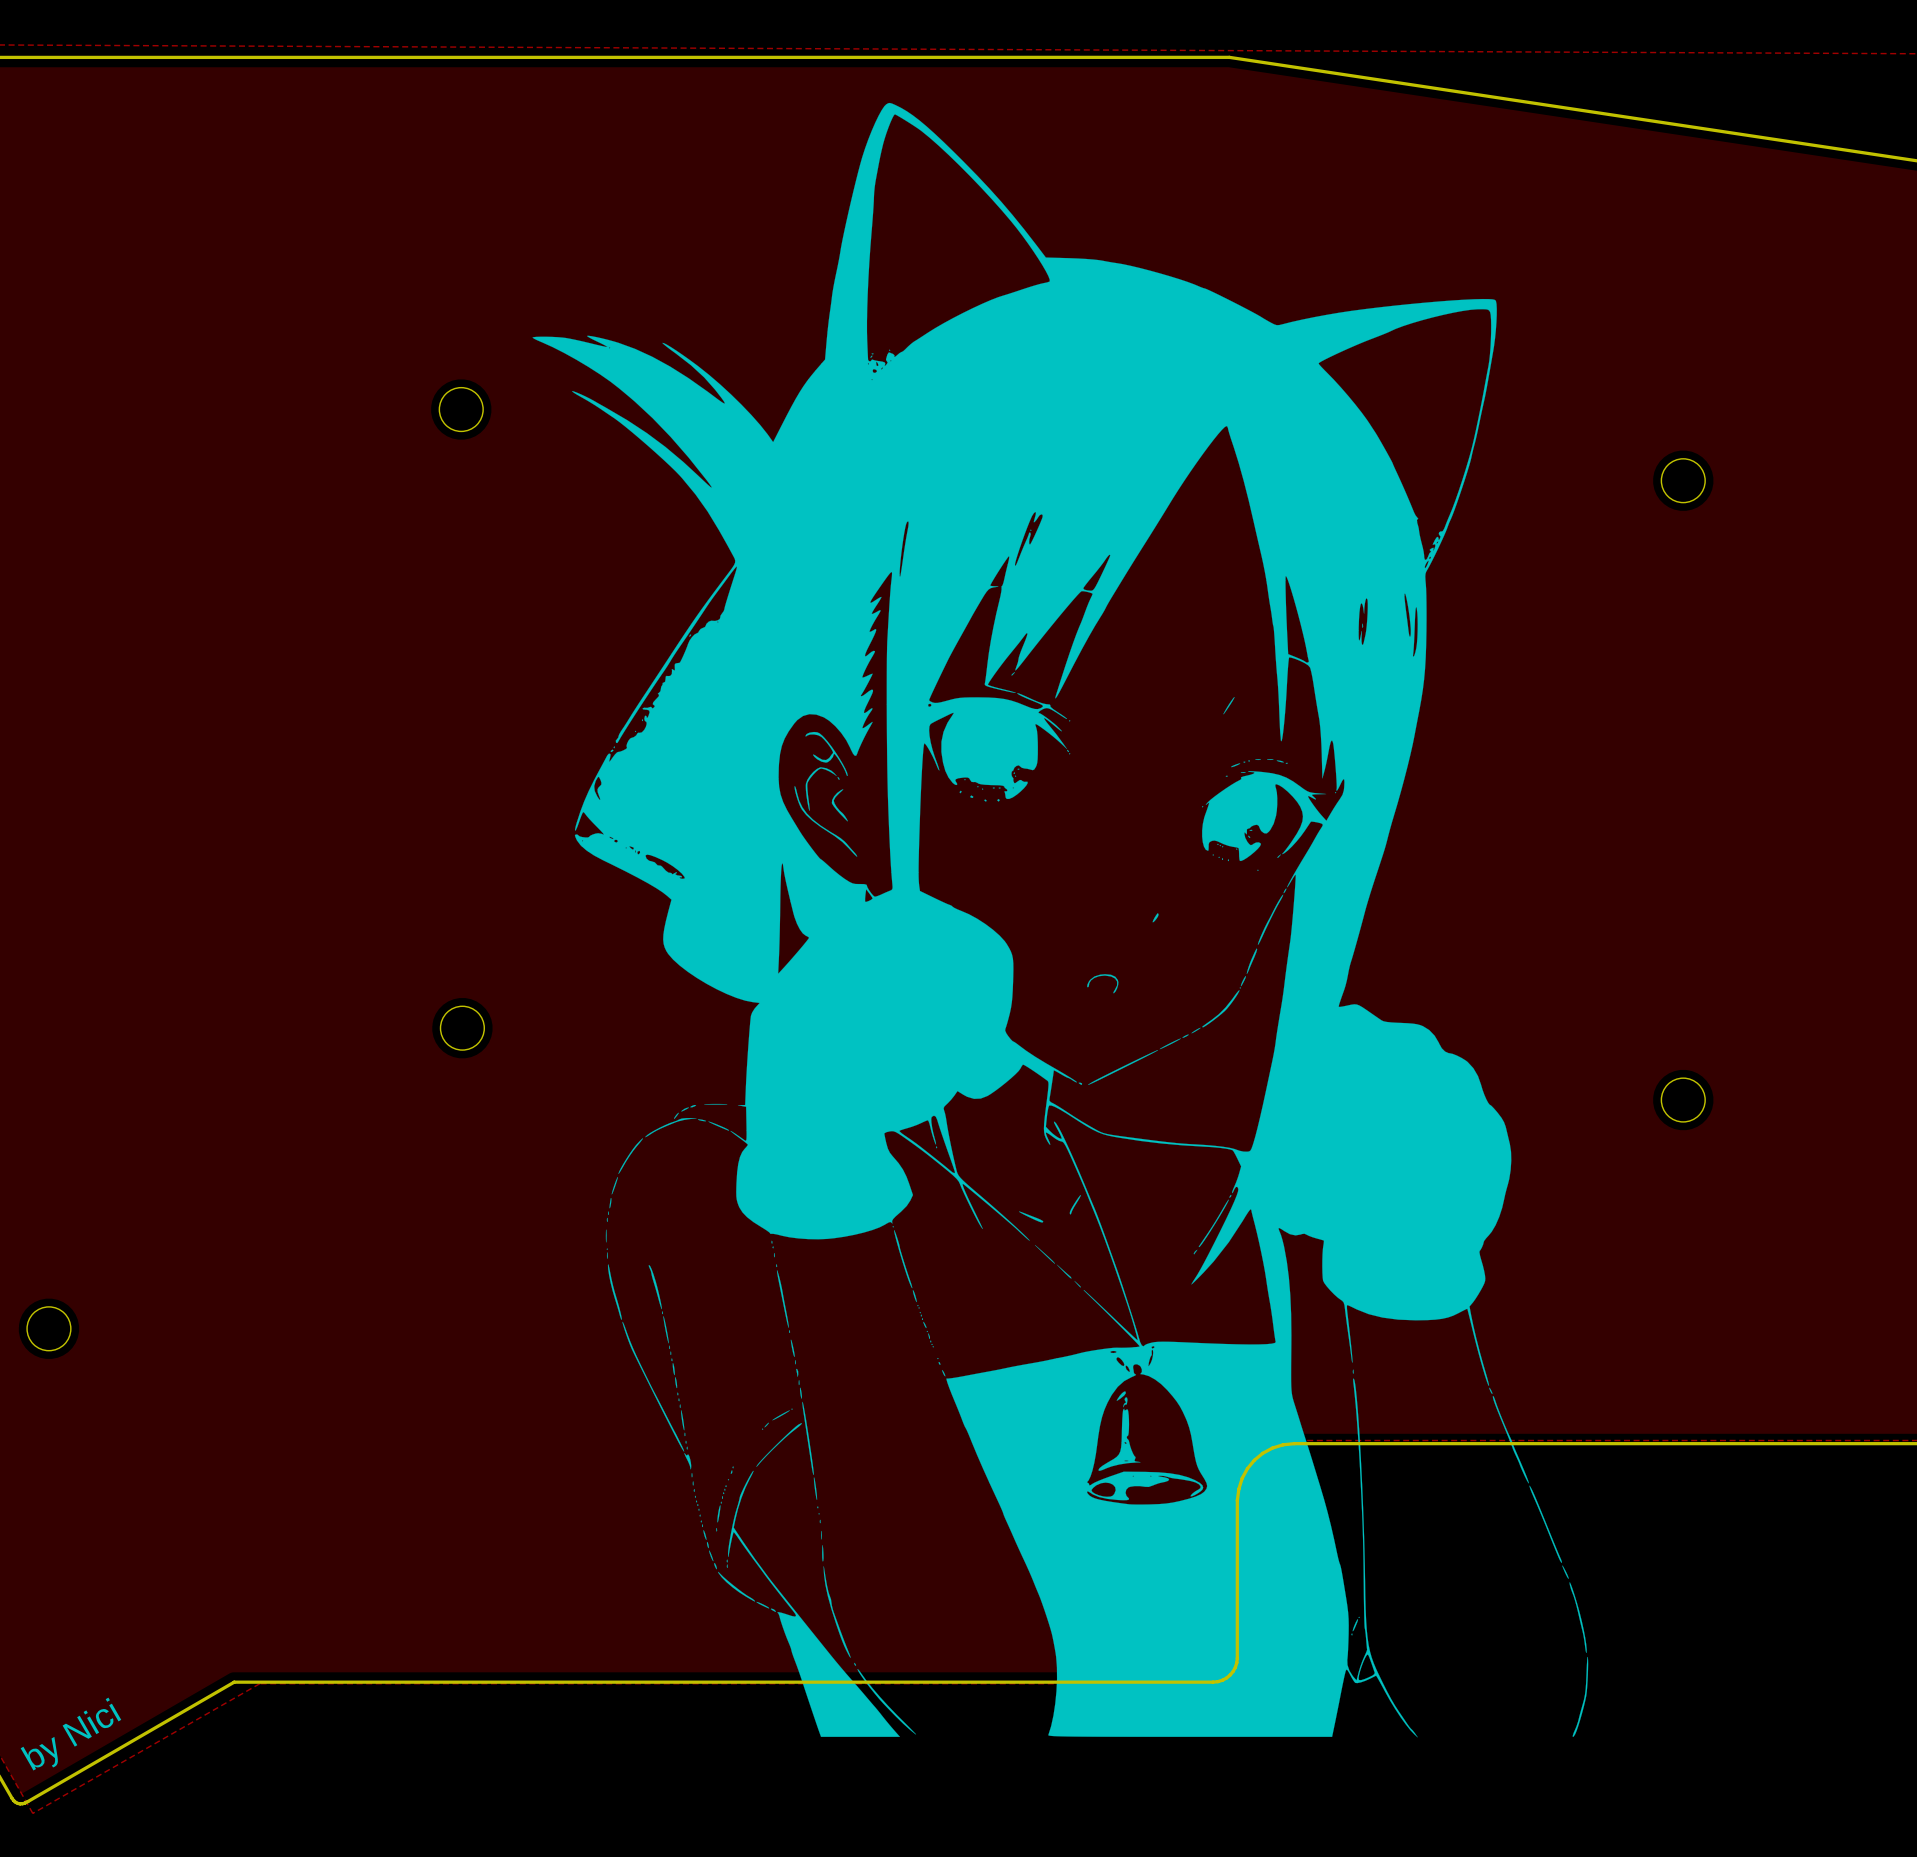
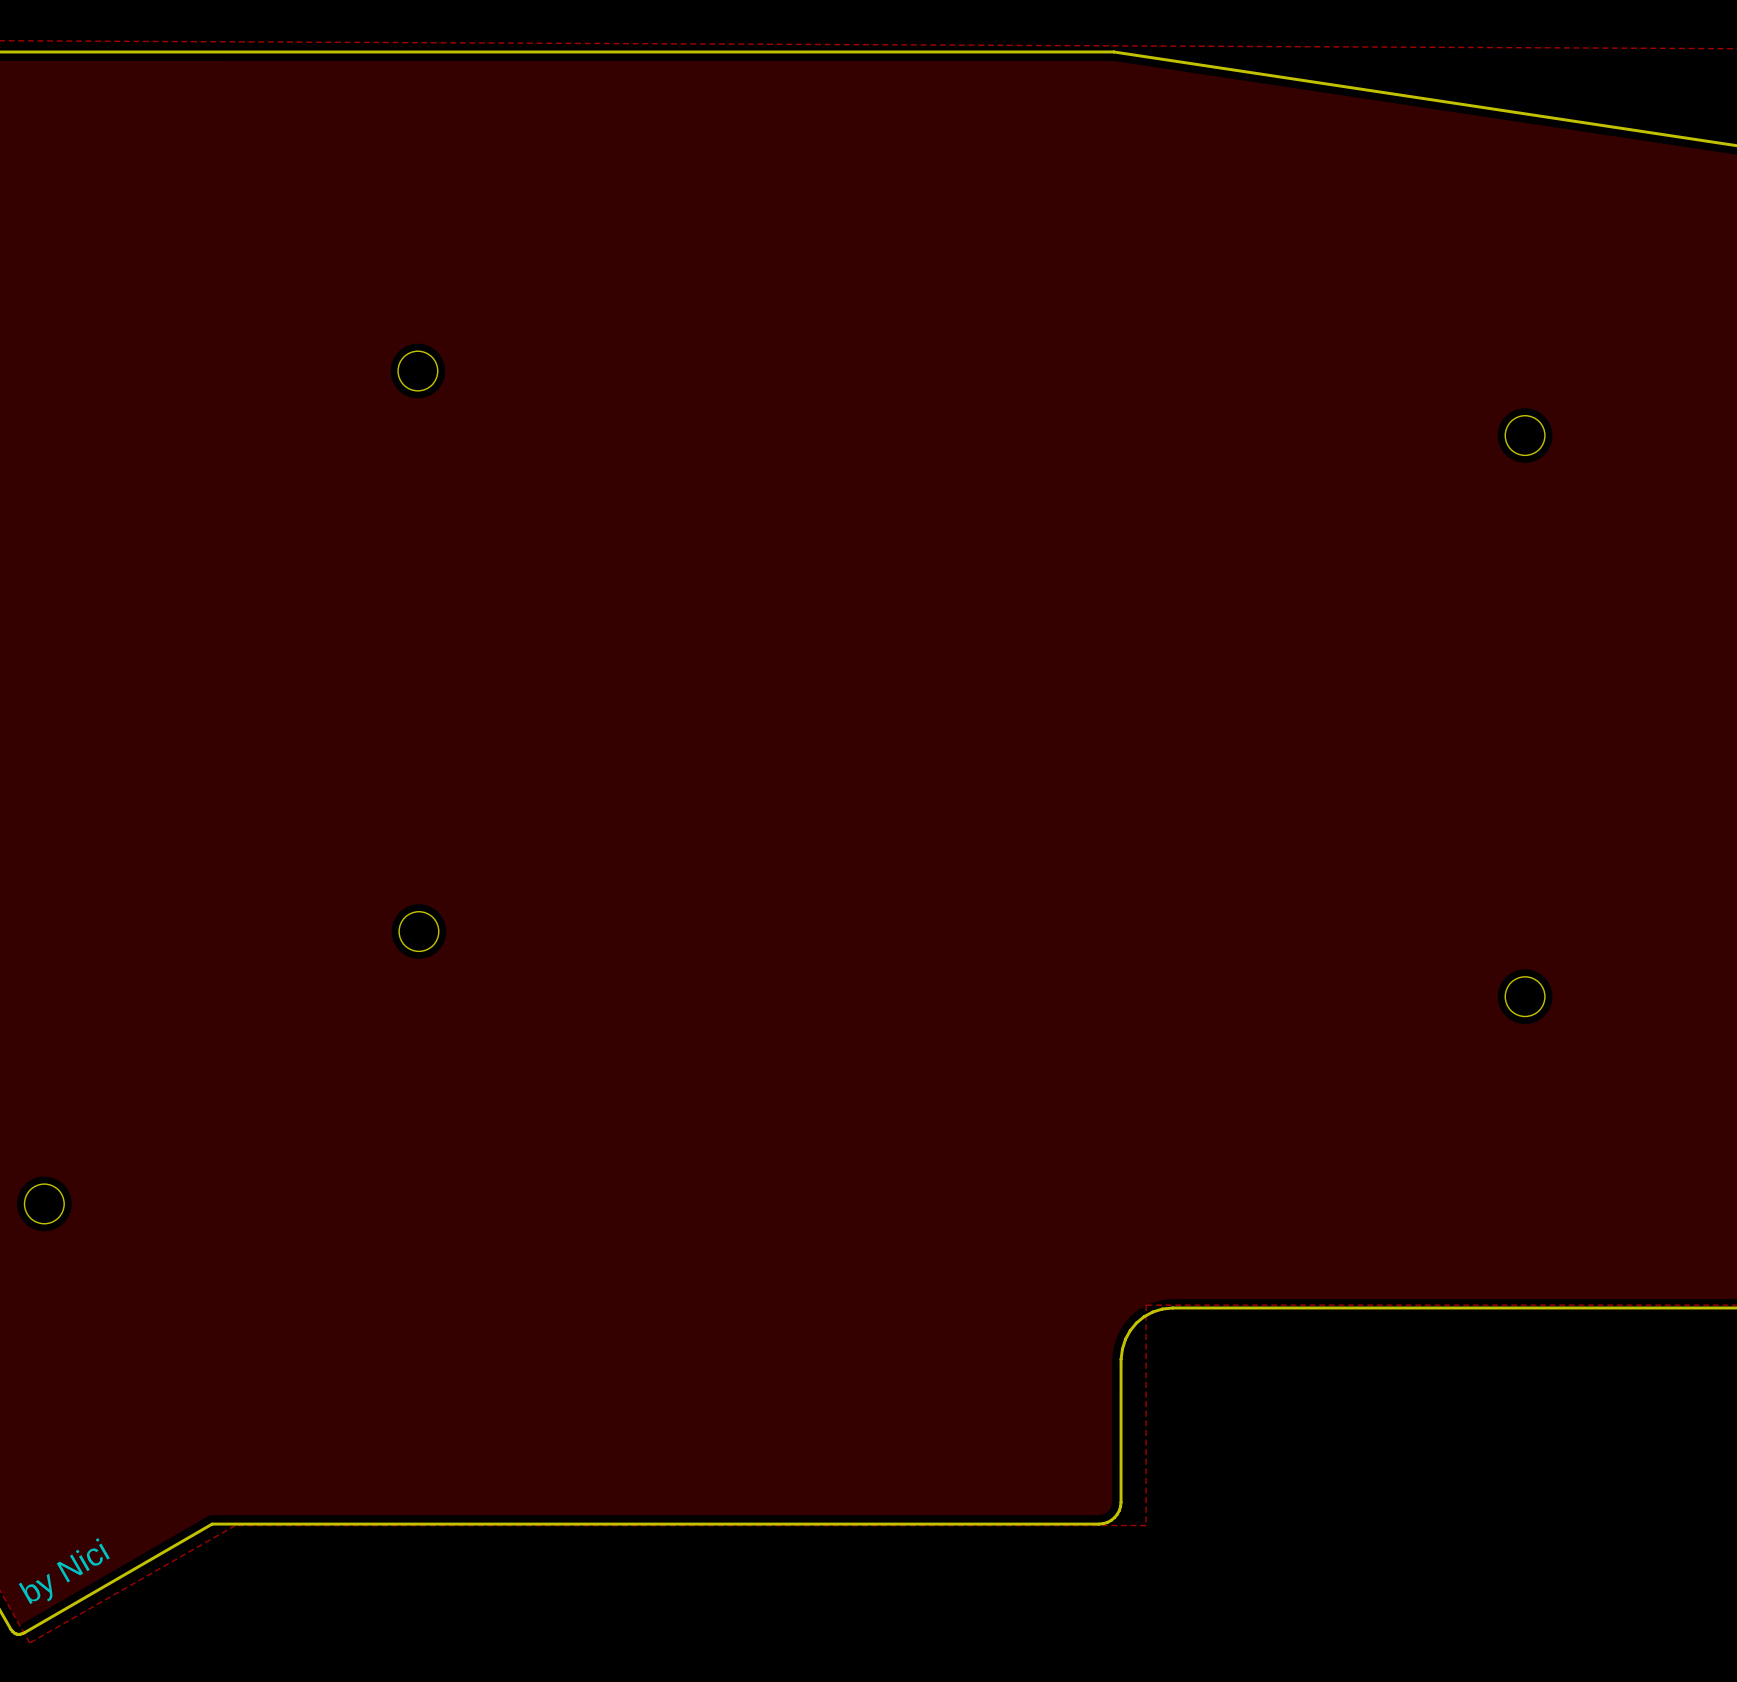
drawing: [532, 102, 1589, 1738] -> none

